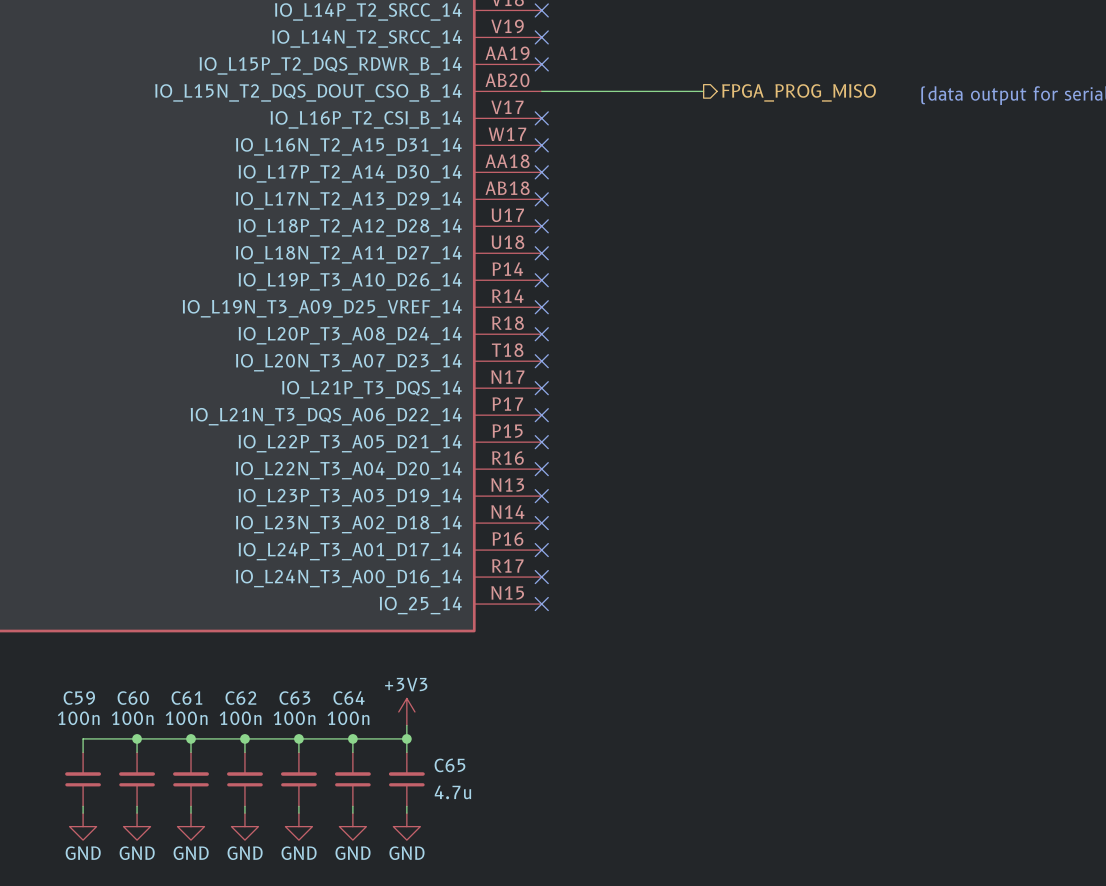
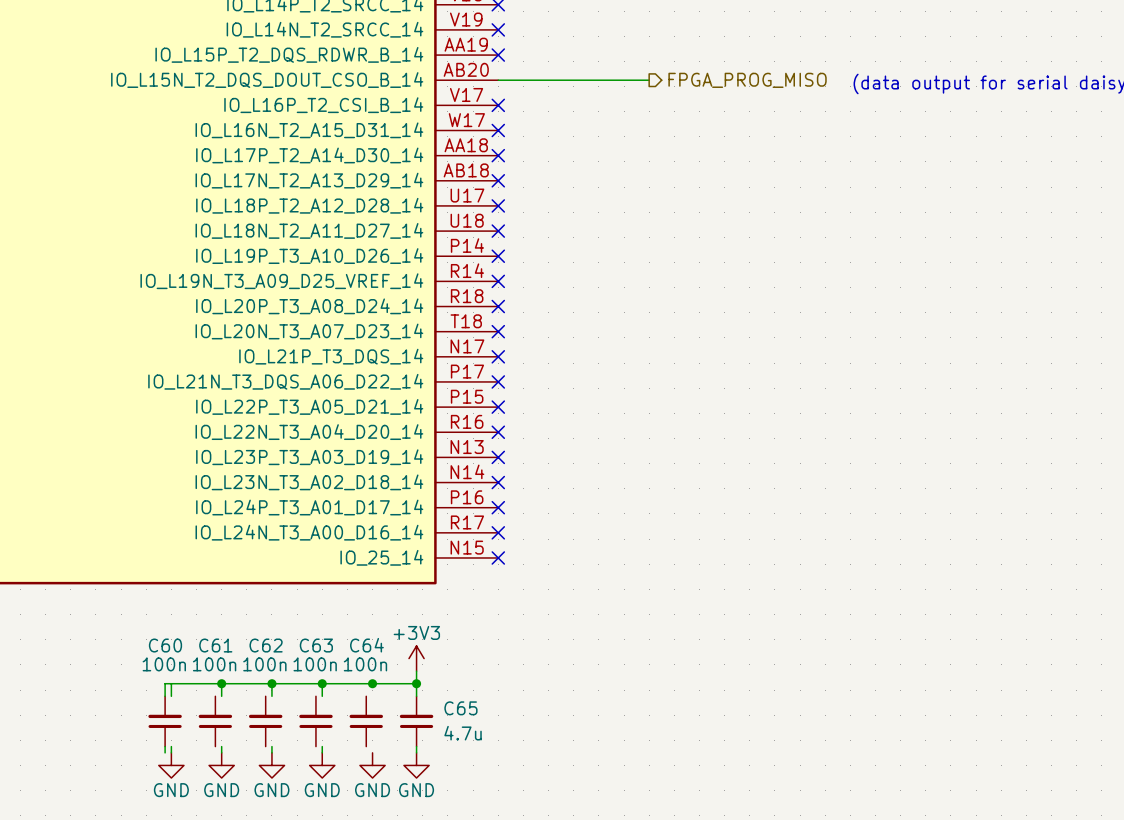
power symbol position: +3V3 (406, 711) -> +3V3 (416, 658)
wire: (406, 725) (406, 752) -> (416, 671) (416, 696)
wire: (137, 738) (137, 752) -> none
junction: (137, 738) -> none
wire: (184, 738) (83, 738) (83, 752) -> (165, 683) (165, 696)
junction: (191, 738) -> none
wire: none -> (372, 683) (416, 683)
junction: none -> (416, 683)
C59: 100n (83, 779) -> none
C60 position: (137, 779) -> (165, 721)
C61 position: (191, 779) -> (215, 721)
C62 position: (244, 779) -> (265, 721)
C63 position: (298, 779) -> (315, 721)
C64 position: (352, 779) -> (366, 721)
C65 position: (406, 779) -> (416, 721)
wire: (83, 806) (83, 813) -> none
wire: (137, 806) (137, 813) -> (165, 746) (165, 752)
wire: (406, 806) (406, 813) -> (416, 746) (416, 752)
power symbol: GND (83, 826) -> none
power symbol: GND (137, 826) -> none
power symbol: none -> GND (416, 765)

